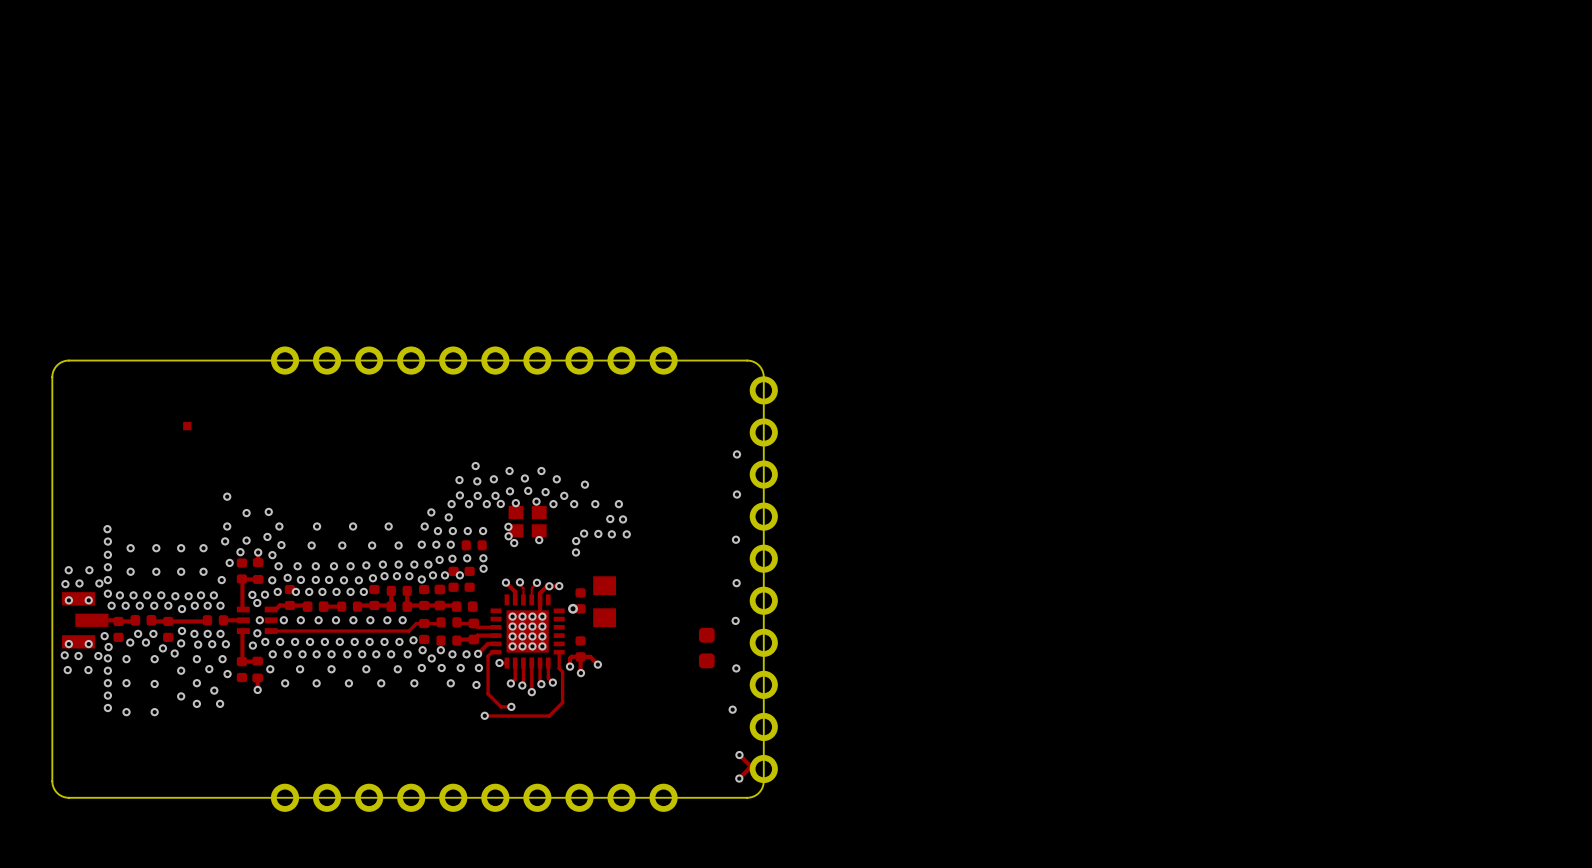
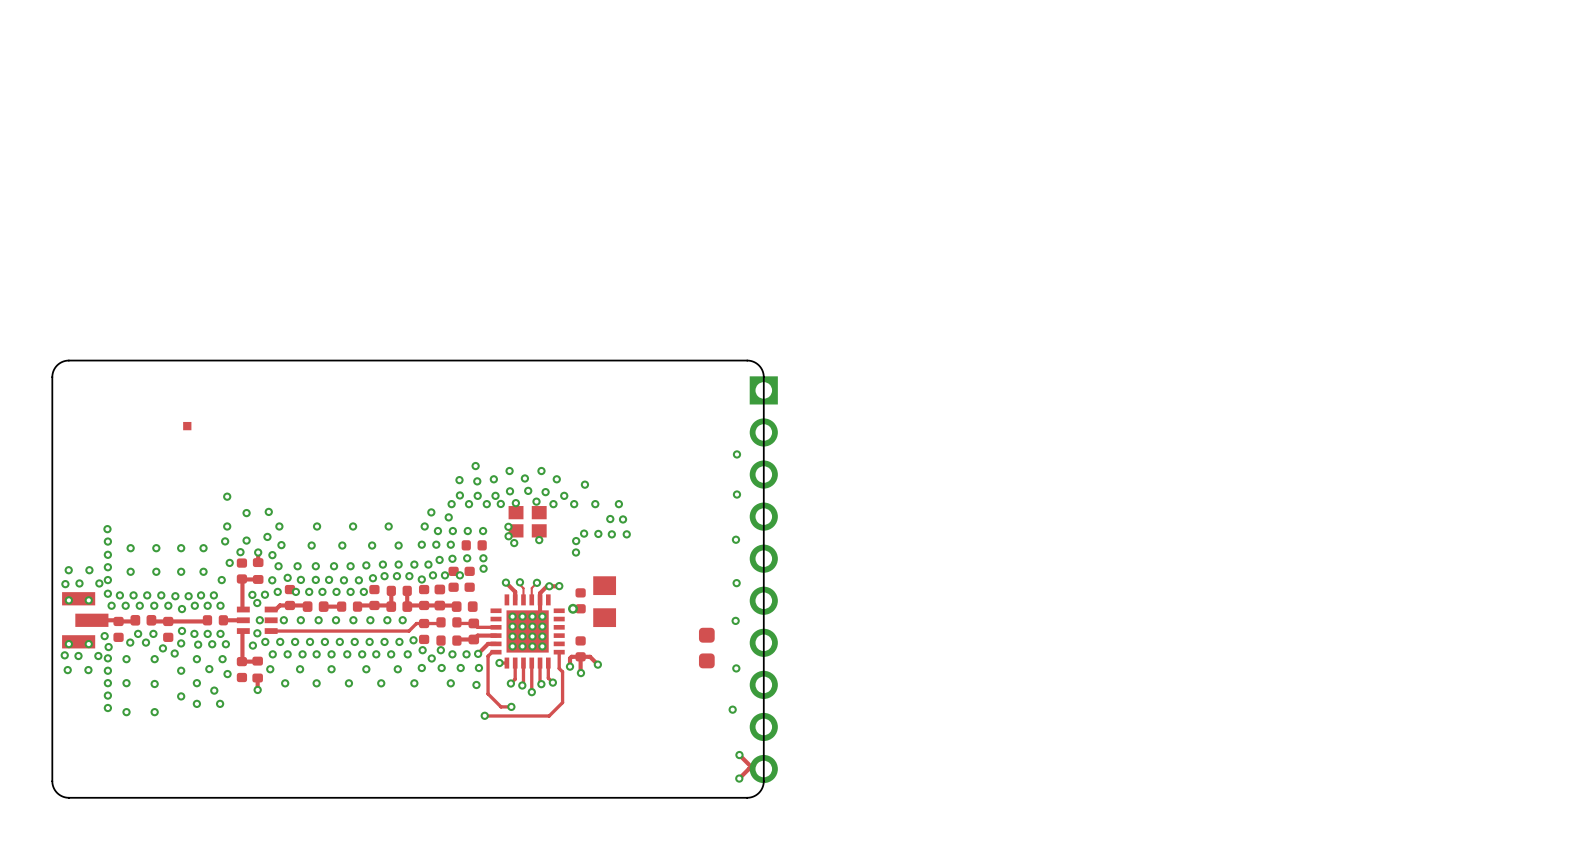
part: (474, 360) -> none
part footprint: [749, 376, 778, 784] -> [749, 376, 778, 784]
part: (474, 797) -> none

